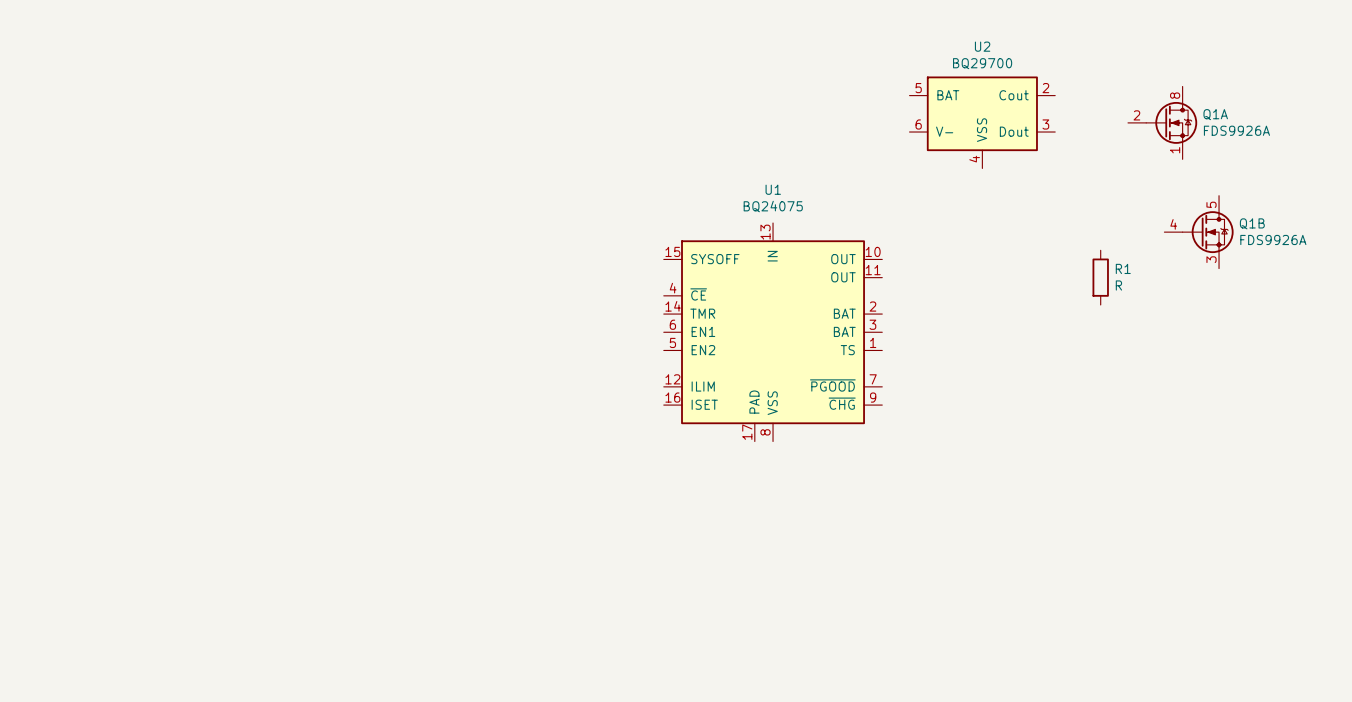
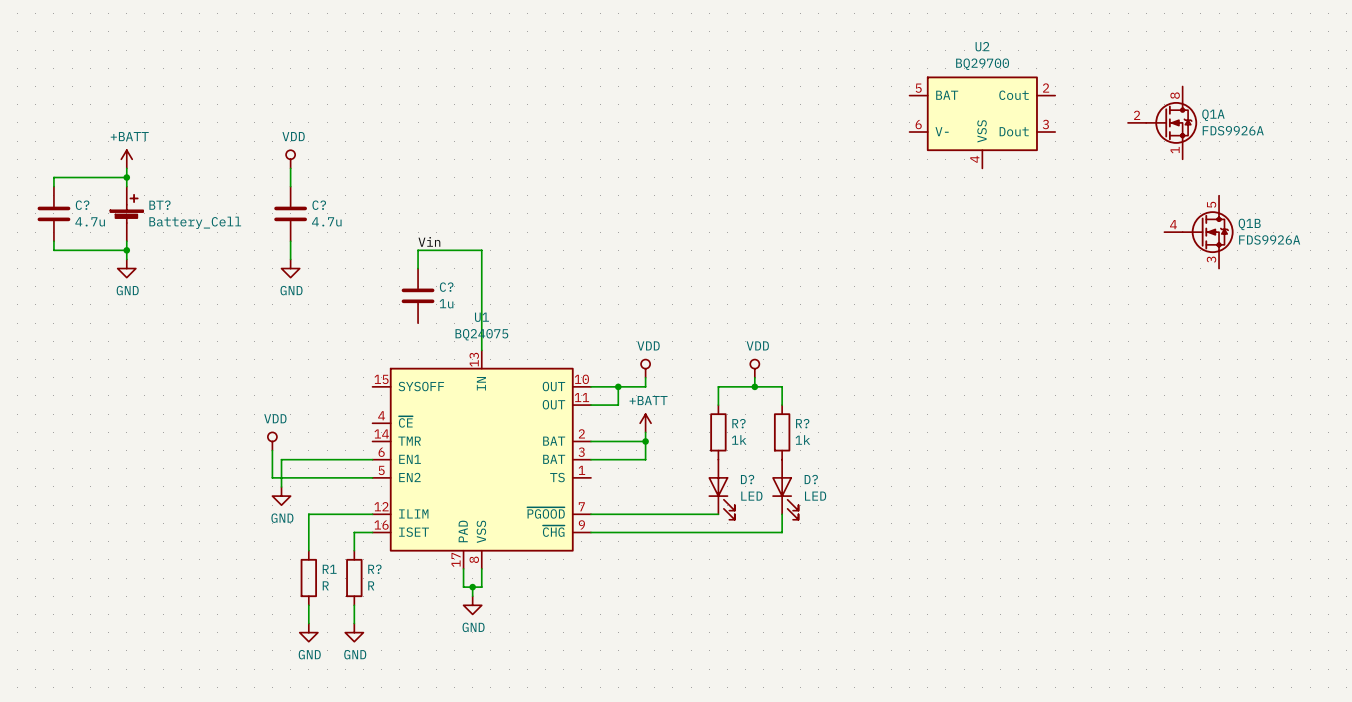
power symbol: none -> +BATT (126, 159)
power symbol: none -> VDD (290, 159)
wire: none -> (126, 168) (126, 186)
wire: none -> (290, 168) (290, 186)
wire: none -> (126, 177) (53, 177) (53, 186)
junction: none -> (126, 177)
C?: none -> 4.7u (53, 213)
BT?: none -> Battery_Cell (126, 213)
C?: none -> 4.7u (290, 213)
wire: none -> (53, 241) (53, 250) (126, 250)
wire: none -> (126, 241) (126, 259)
wire: none -> (290, 241) (290, 259)
label: none -> Vin (429, 241)
junction: none -> (126, 250)
power symbol: none -> GND (126, 268)
power symbol: none -> GND (290, 268)
wire: none -> (418, 268) (418, 250) (481, 250) (481, 350)
R1 position: (1100, 277) -> (308, 578)
C?: none -> 1u (418, 295)
U1 position: (773, 332) -> (481, 459)
power symbol: none -> VDD (645, 368)
power symbol: none -> VDD (754, 368)
wire: none -> (645, 377) (645, 386) (590, 386)
wire: none -> (618, 386) (618, 405) (590, 405)
junction: none -> (618, 386)
junction: none -> (754, 386)
power symbol: none -> +BATT (645, 423)
wire: none -> (645, 432) (645, 459) (590, 459)
R?: none -> 1k (718, 432)
R?: none -> 1k (782, 432)
power symbol: none -> VDD (272, 441)
wire: none -> (590, 441) (645, 441)
junction: none -> (645, 441)
wire: none -> (272, 450) (272, 477) (372, 477)
wire: none -> (372, 459) (281, 459) (281, 486)
D?: none -> LED (721, 489)
D?: none -> LED (785, 489)
power symbol: none -> GND (281, 496)
wire: none -> (372, 514) (308, 514) (308, 550)
wire: none -> (590, 514) (718, 514)
wire: none -> (782, 514) (782, 532) (590, 532)
wire: none -> (372, 532) (354, 532) (354, 550)
wire: none -> (463, 568) (463, 587) (481, 587) (481, 568)
R?: none -> R (354, 578)
wire: none -> (472, 587) (472, 596)
junction: none -> (472, 587)
wire: none -> (308, 605) (308, 623)
wire: none -> (354, 605) (354, 623)
power symbol: none -> GND (472, 605)
power symbol: none -> GND (308, 632)
power symbol: none -> GND (354, 632)

